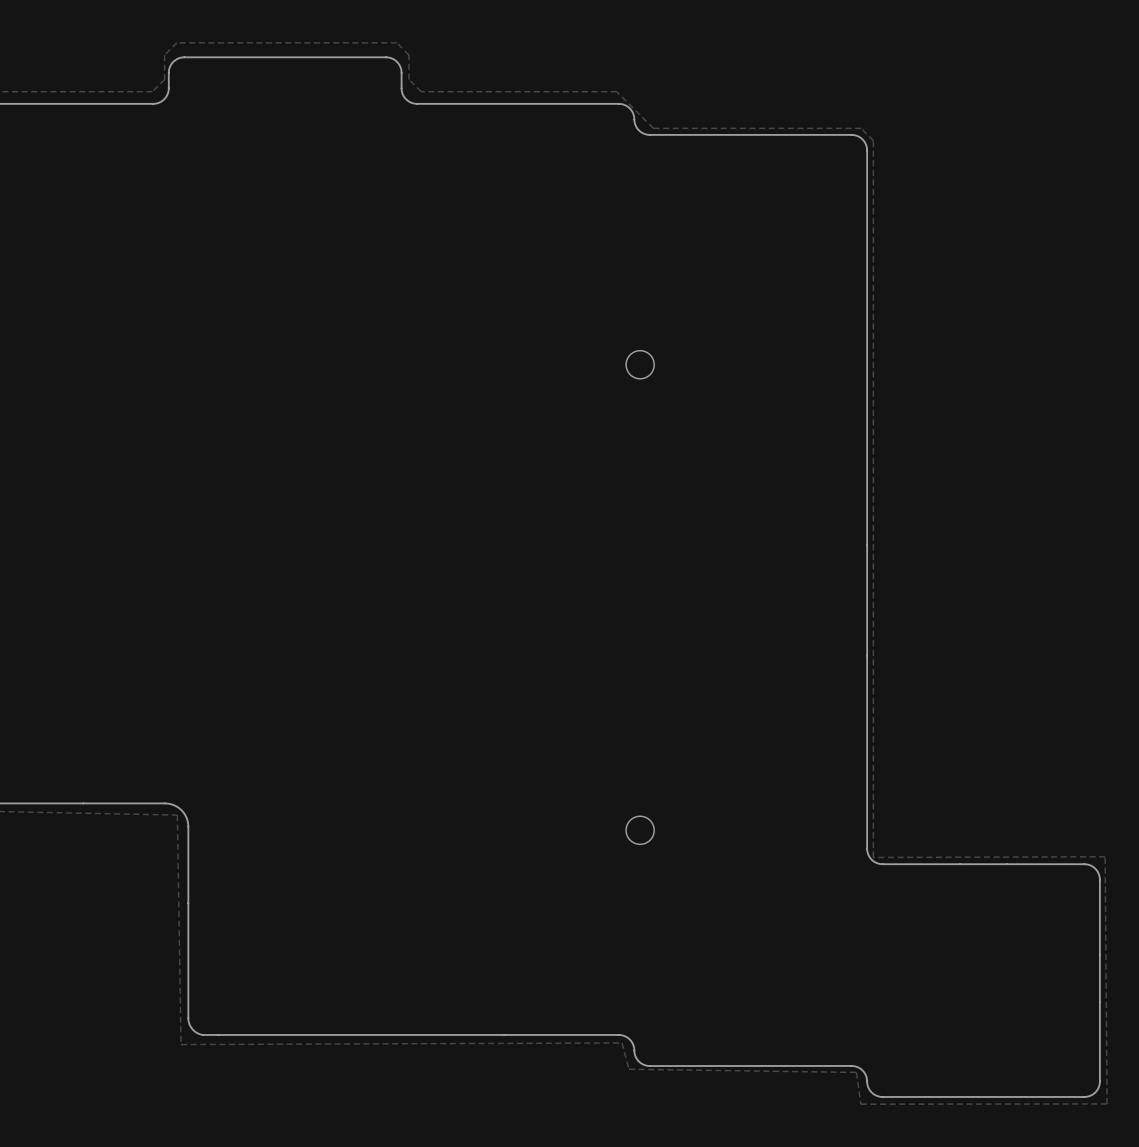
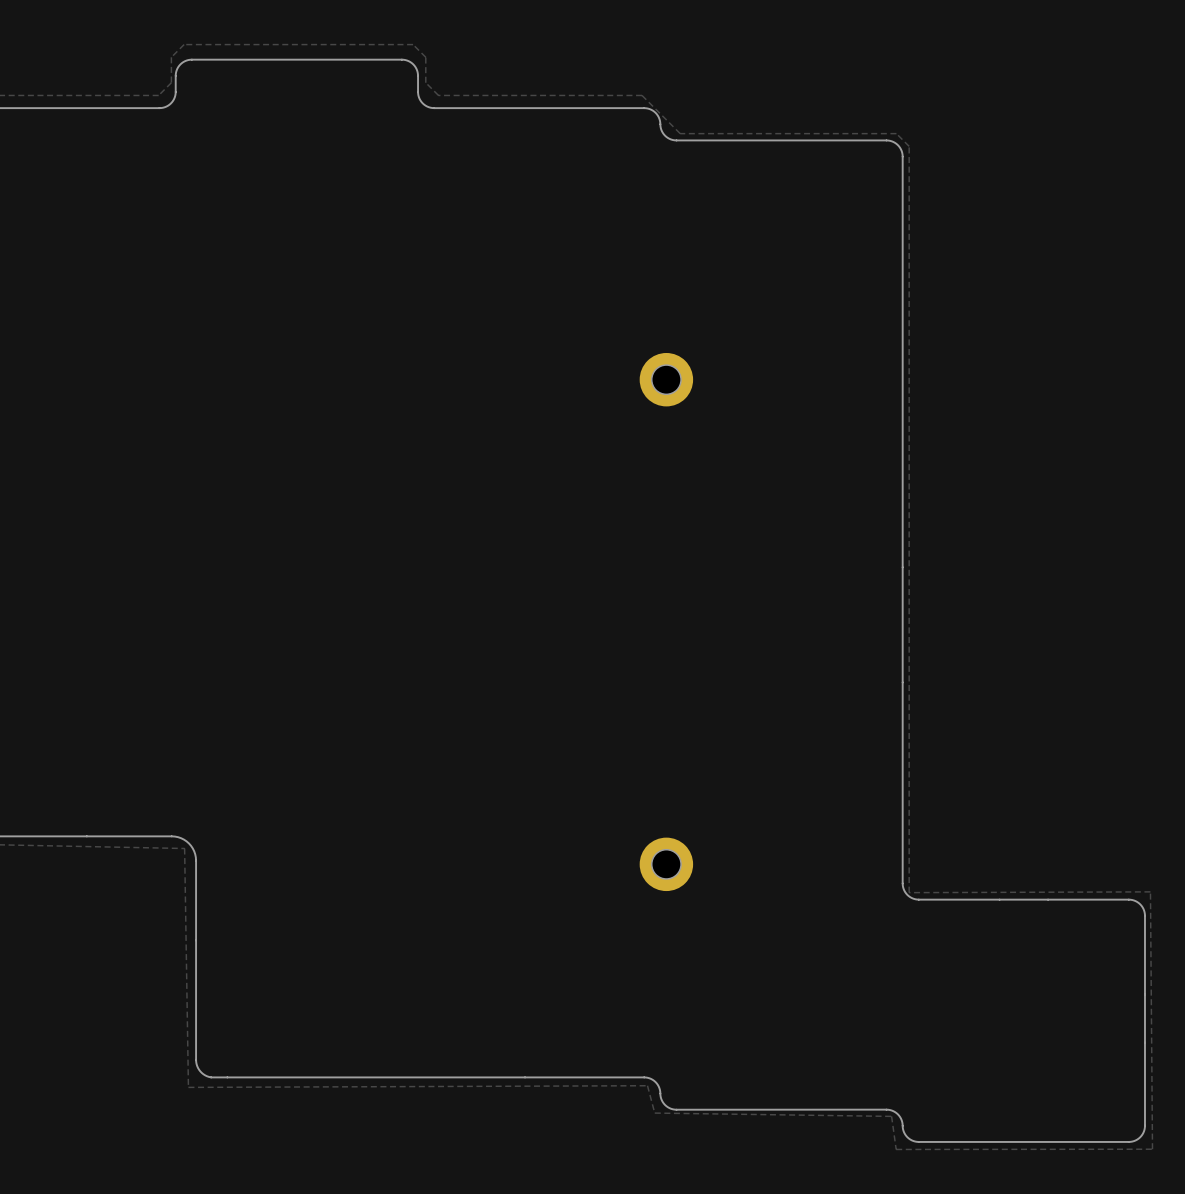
drawing: [625, 350, 655, 380] -> none
part: none -> (666, 379)
drawing: [625, 815, 655, 845] -> none
part: none -> (666, 864)

